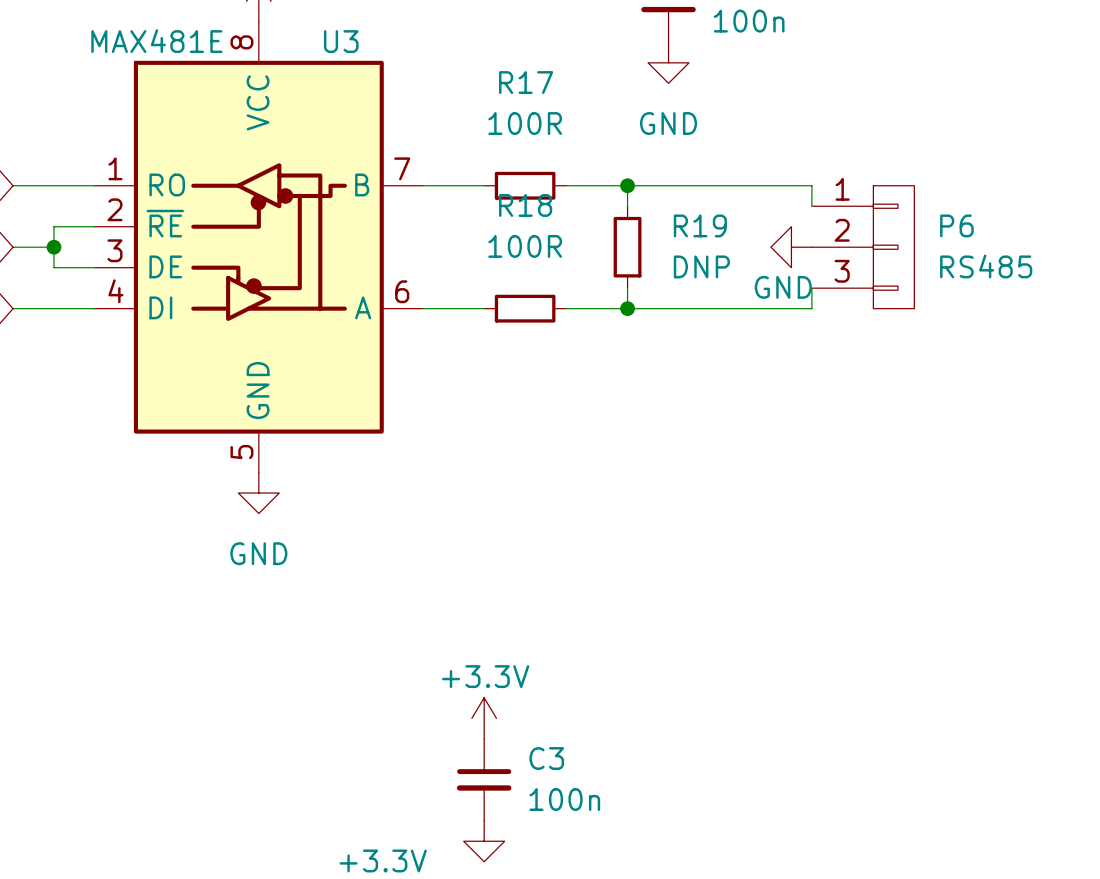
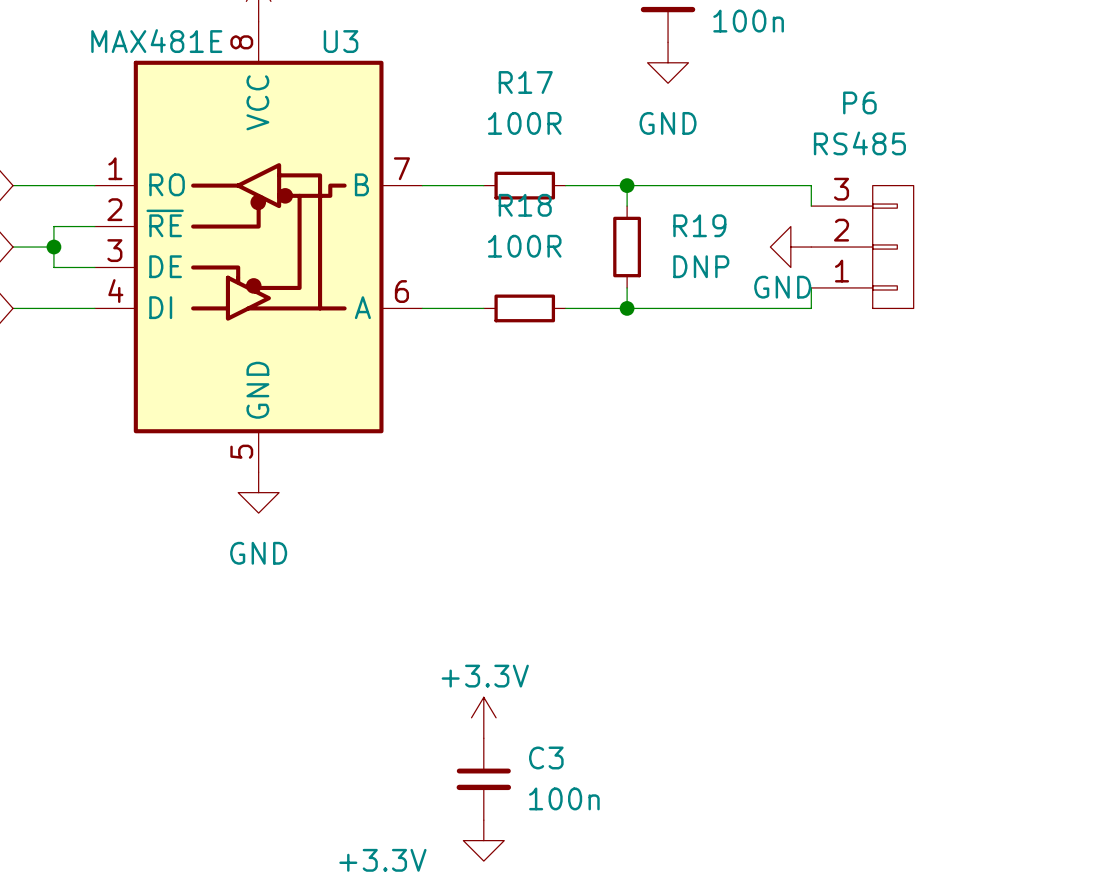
P6 name position: P6 (956, 225) -> P6 (859, 102)
P6 flip: as is (893, 247) -> up-down (893, 247)
P6 value position: RS485 (986, 266) -> RS485 (859, 143)

